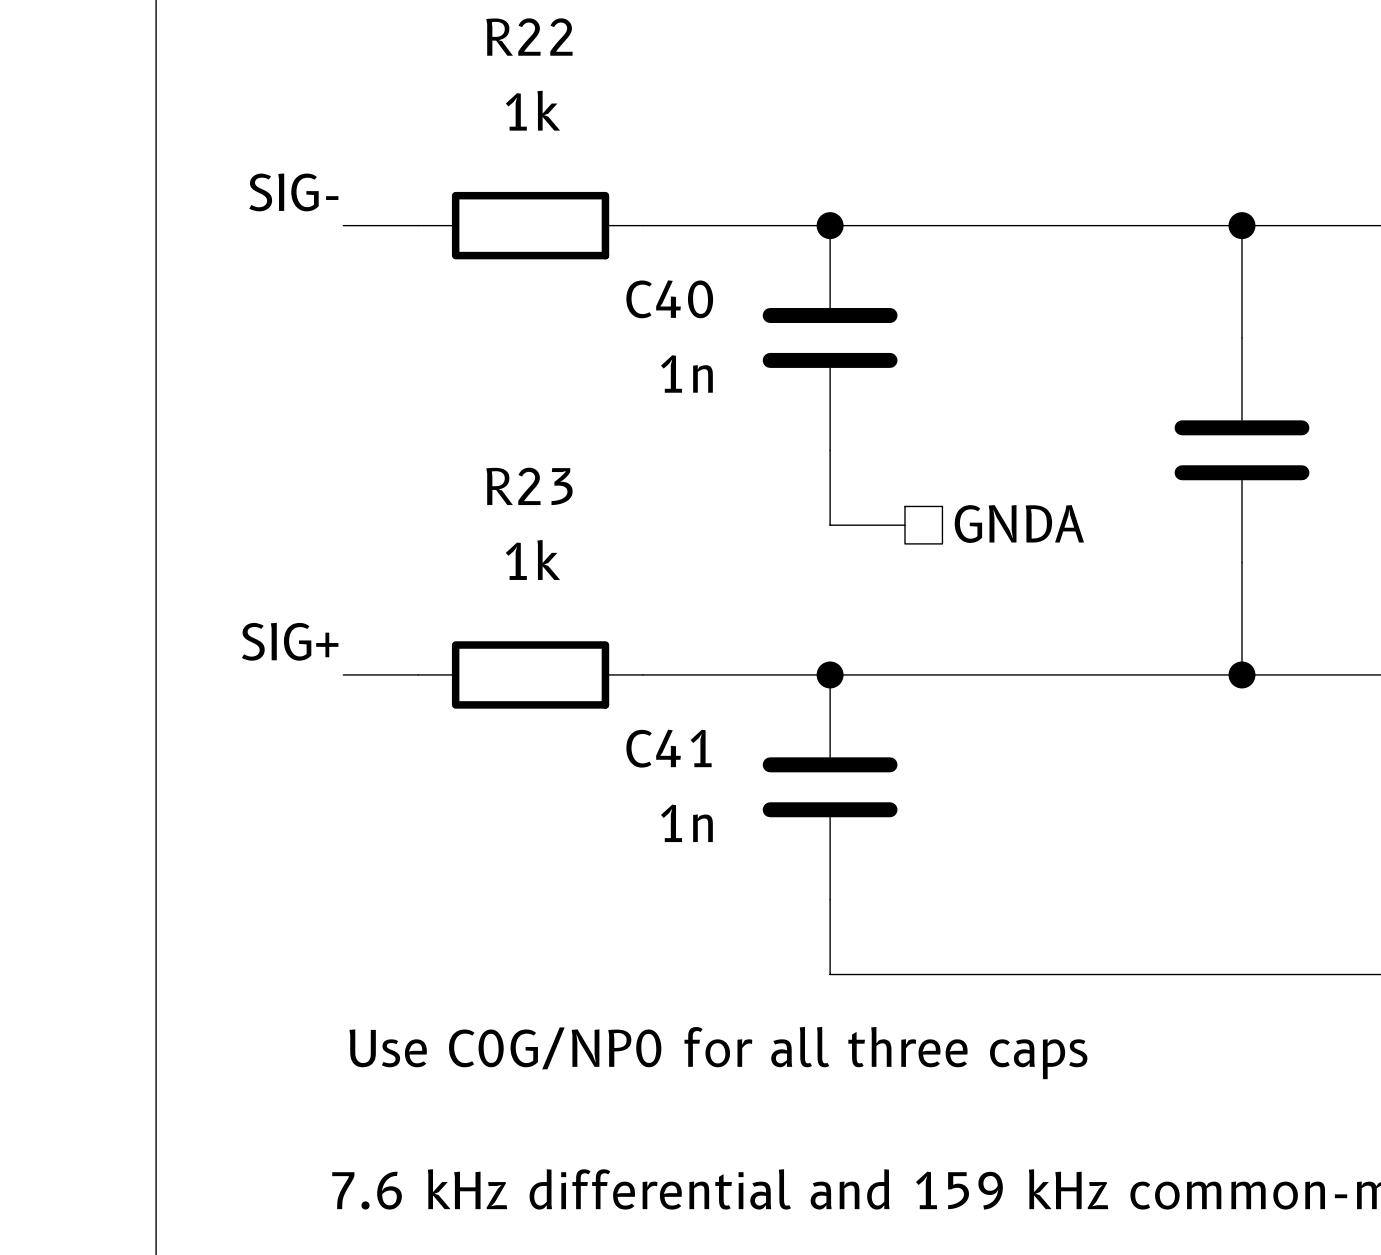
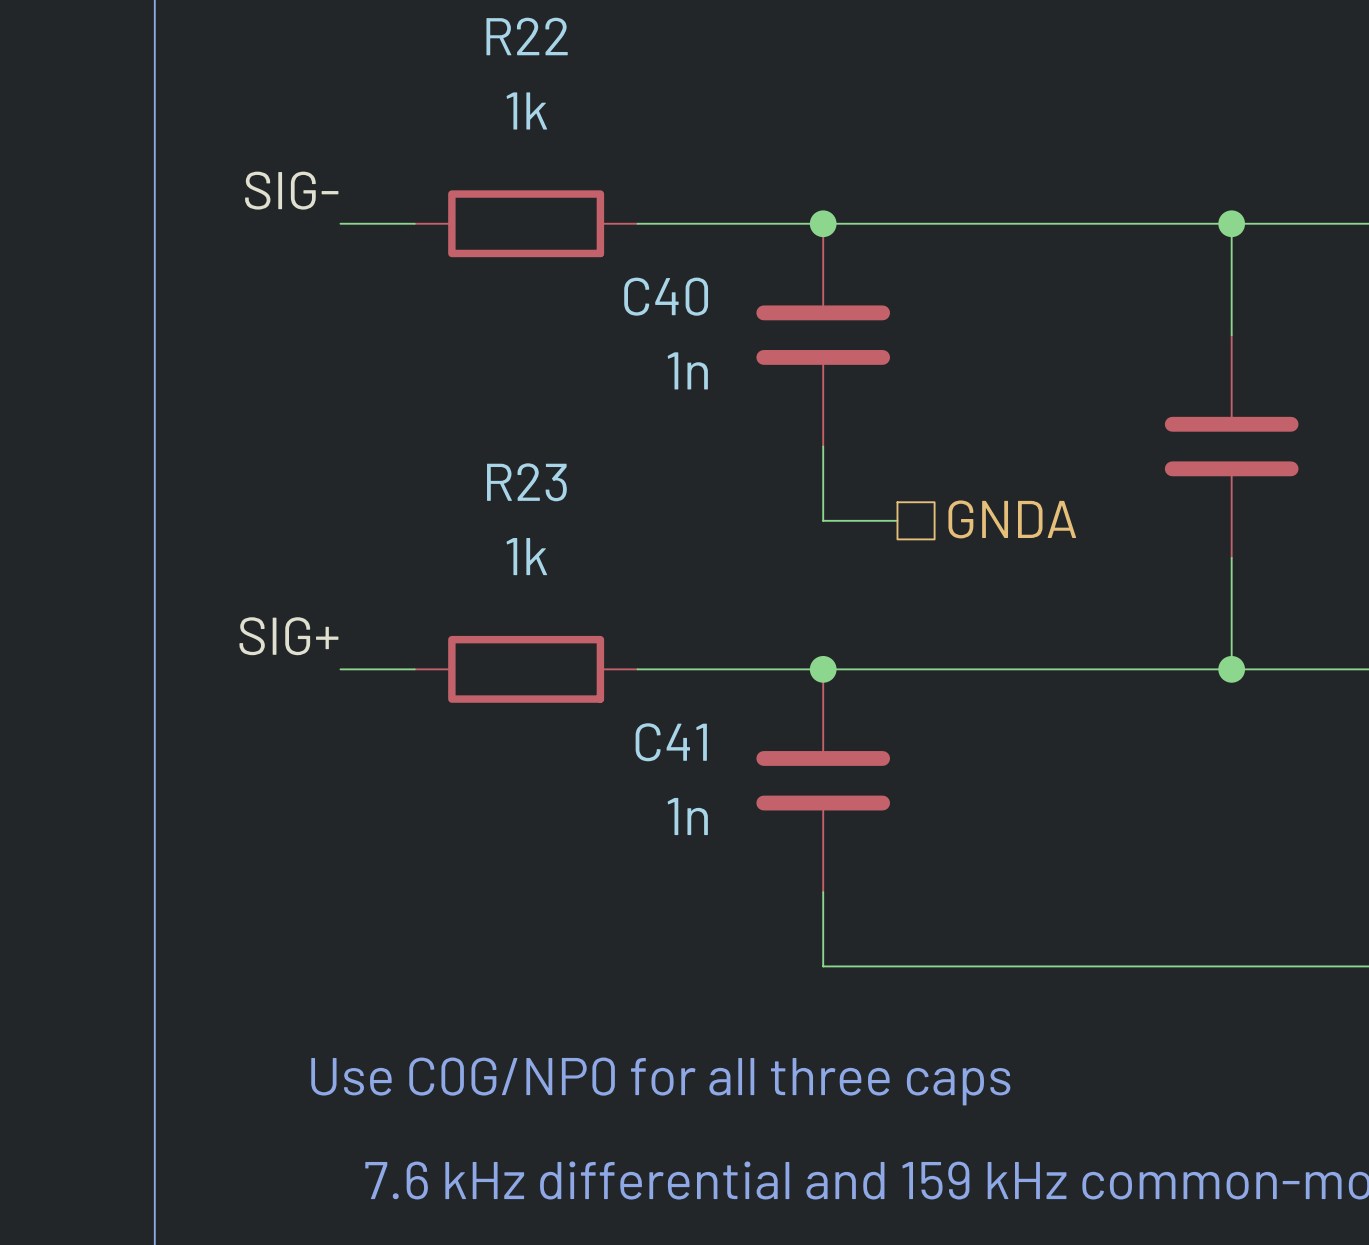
text position: Use C0G/NP0 for all three caps (718, 1053) -> Use C0G/NP0 for all three caps (660, 1081)

